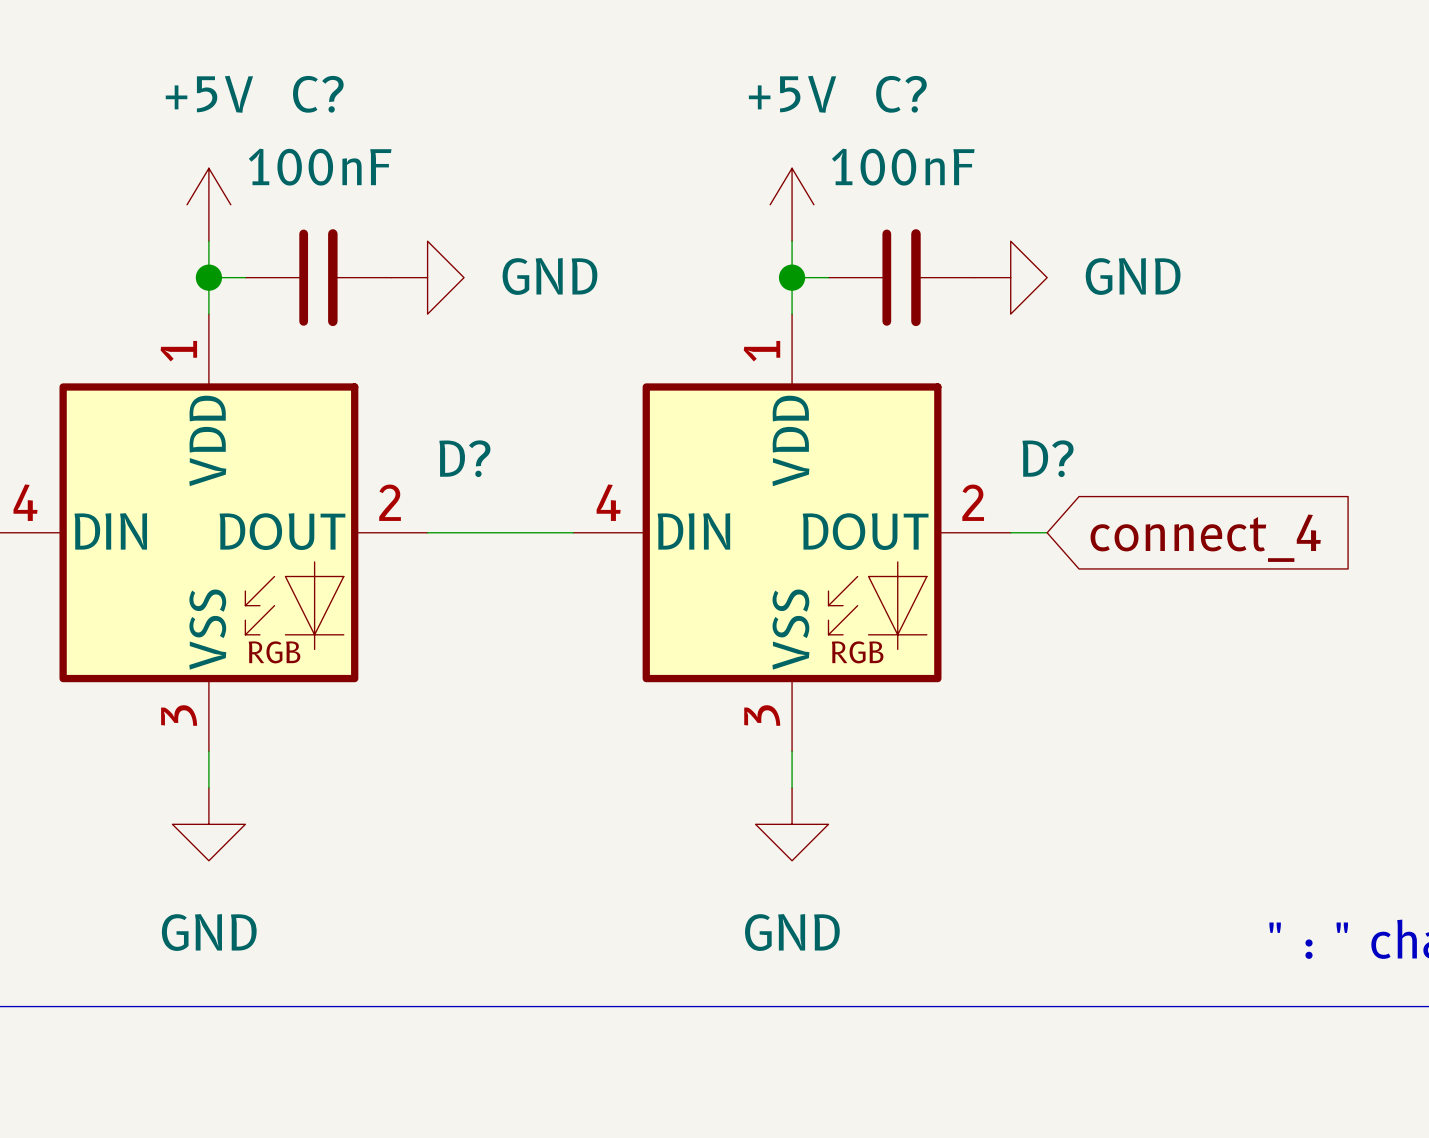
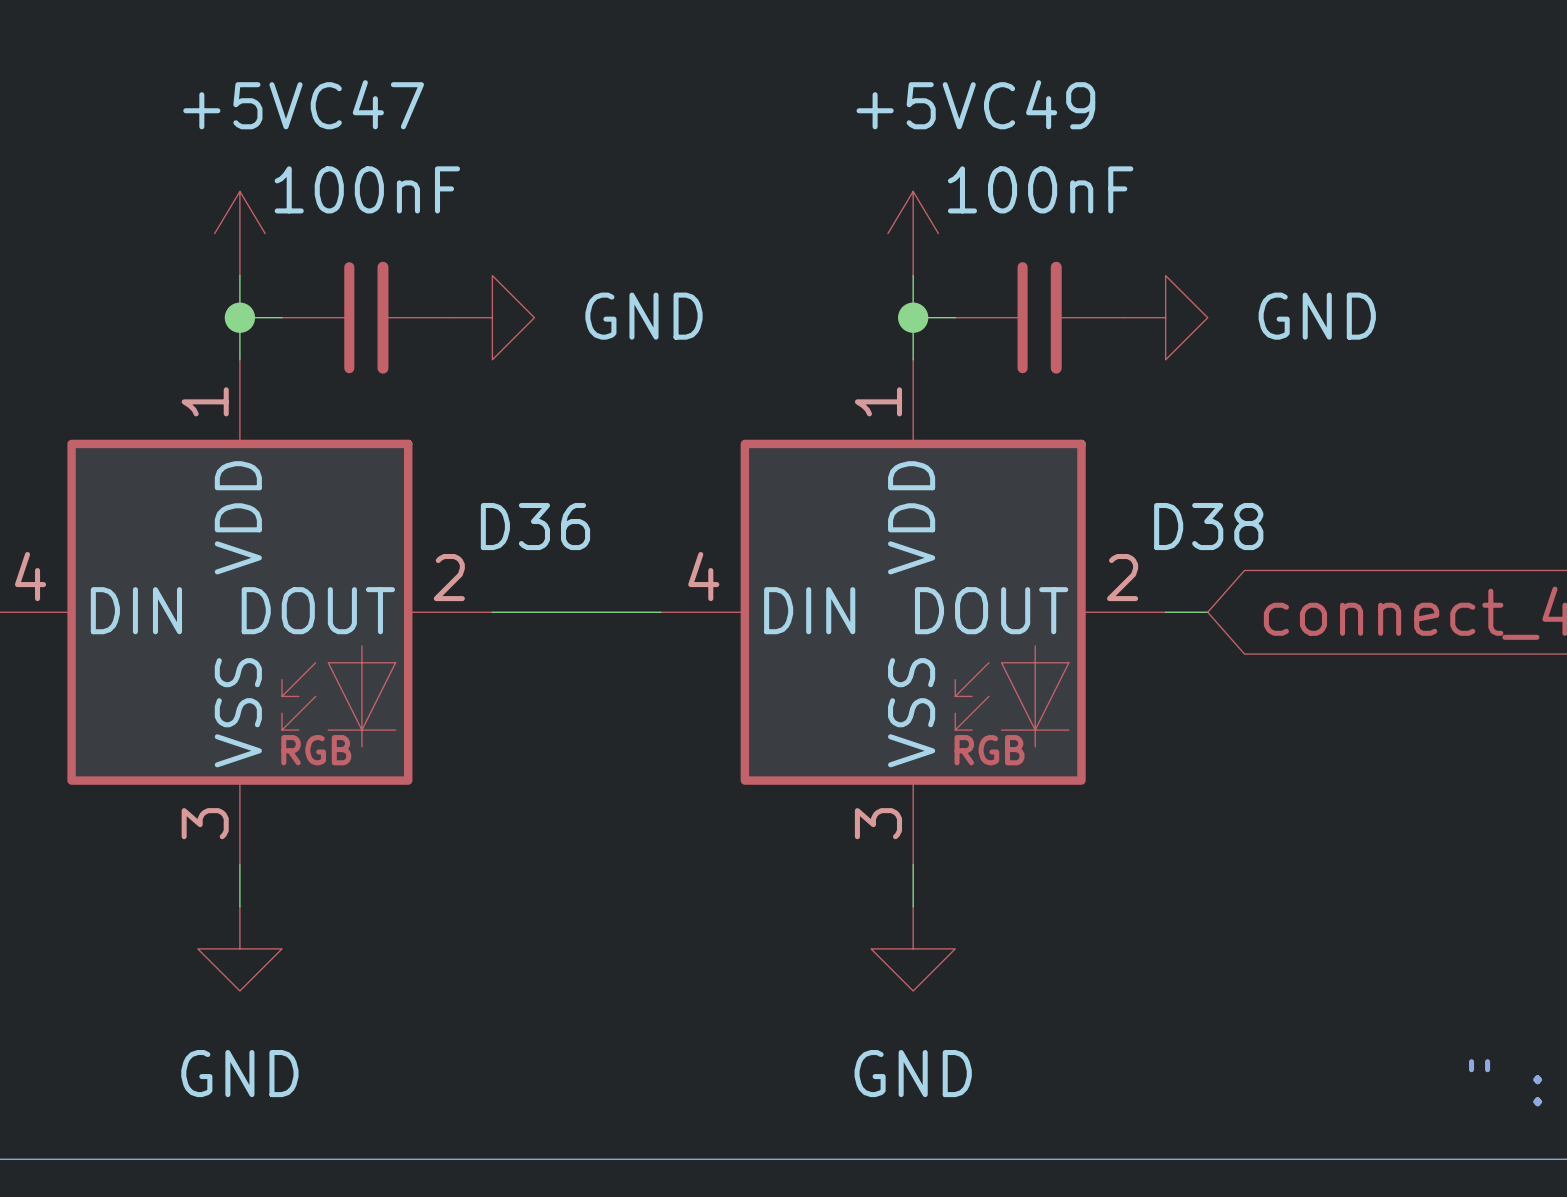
C? name: C? (318, 94) -> C47 (367, 104)
C? name: C? (901, 94) -> C49 (1039, 104)
D? name: D? (464, 458) -> D36 (535, 526)
D? name: D? (1048, 458) -> D38 (1208, 526)

